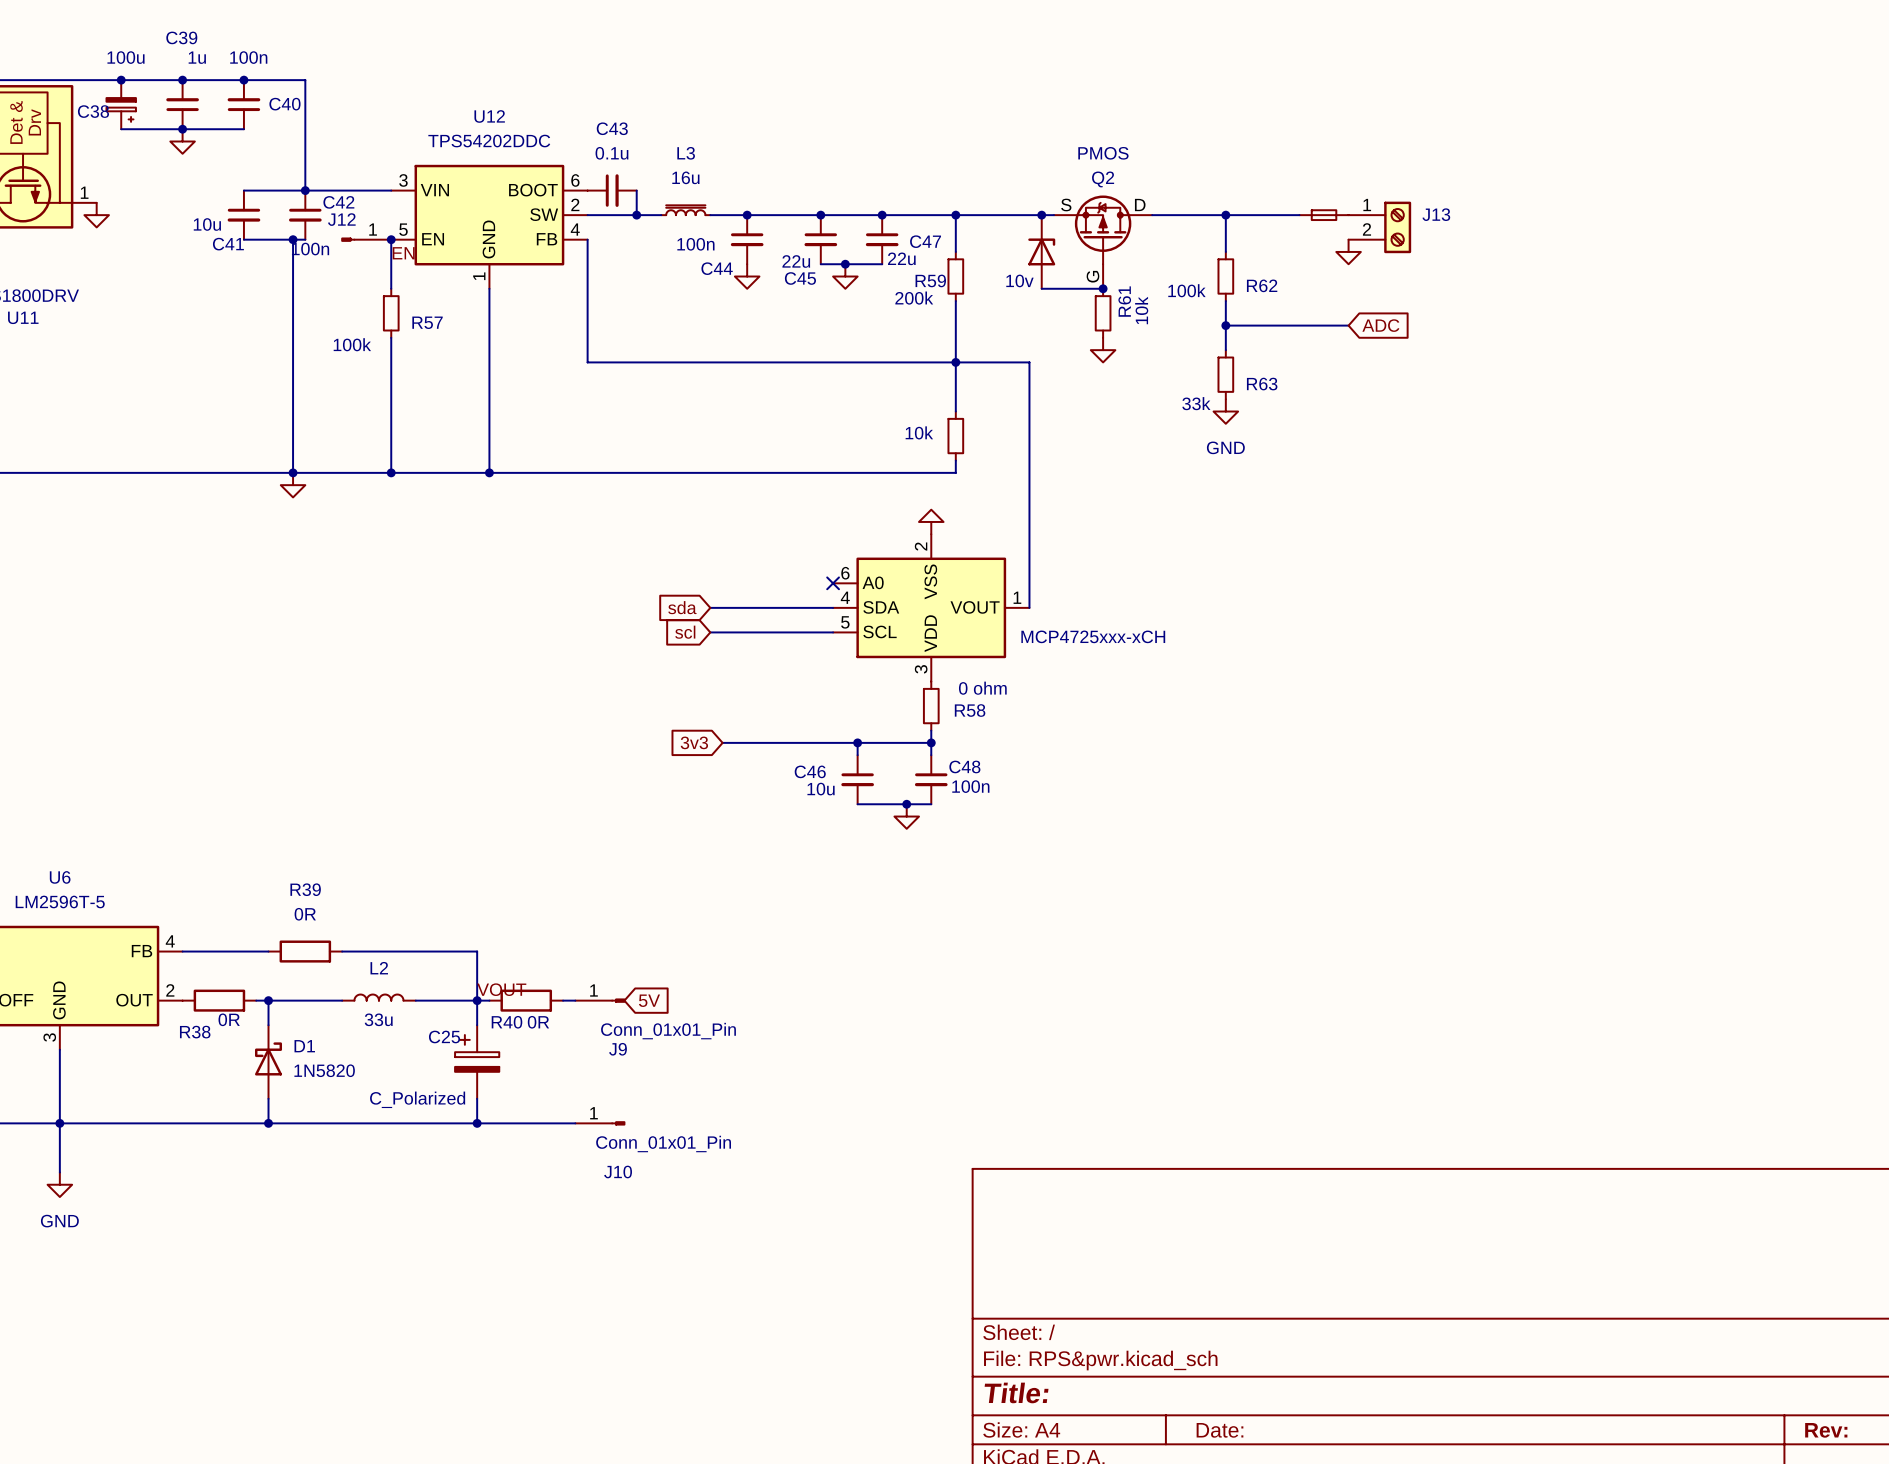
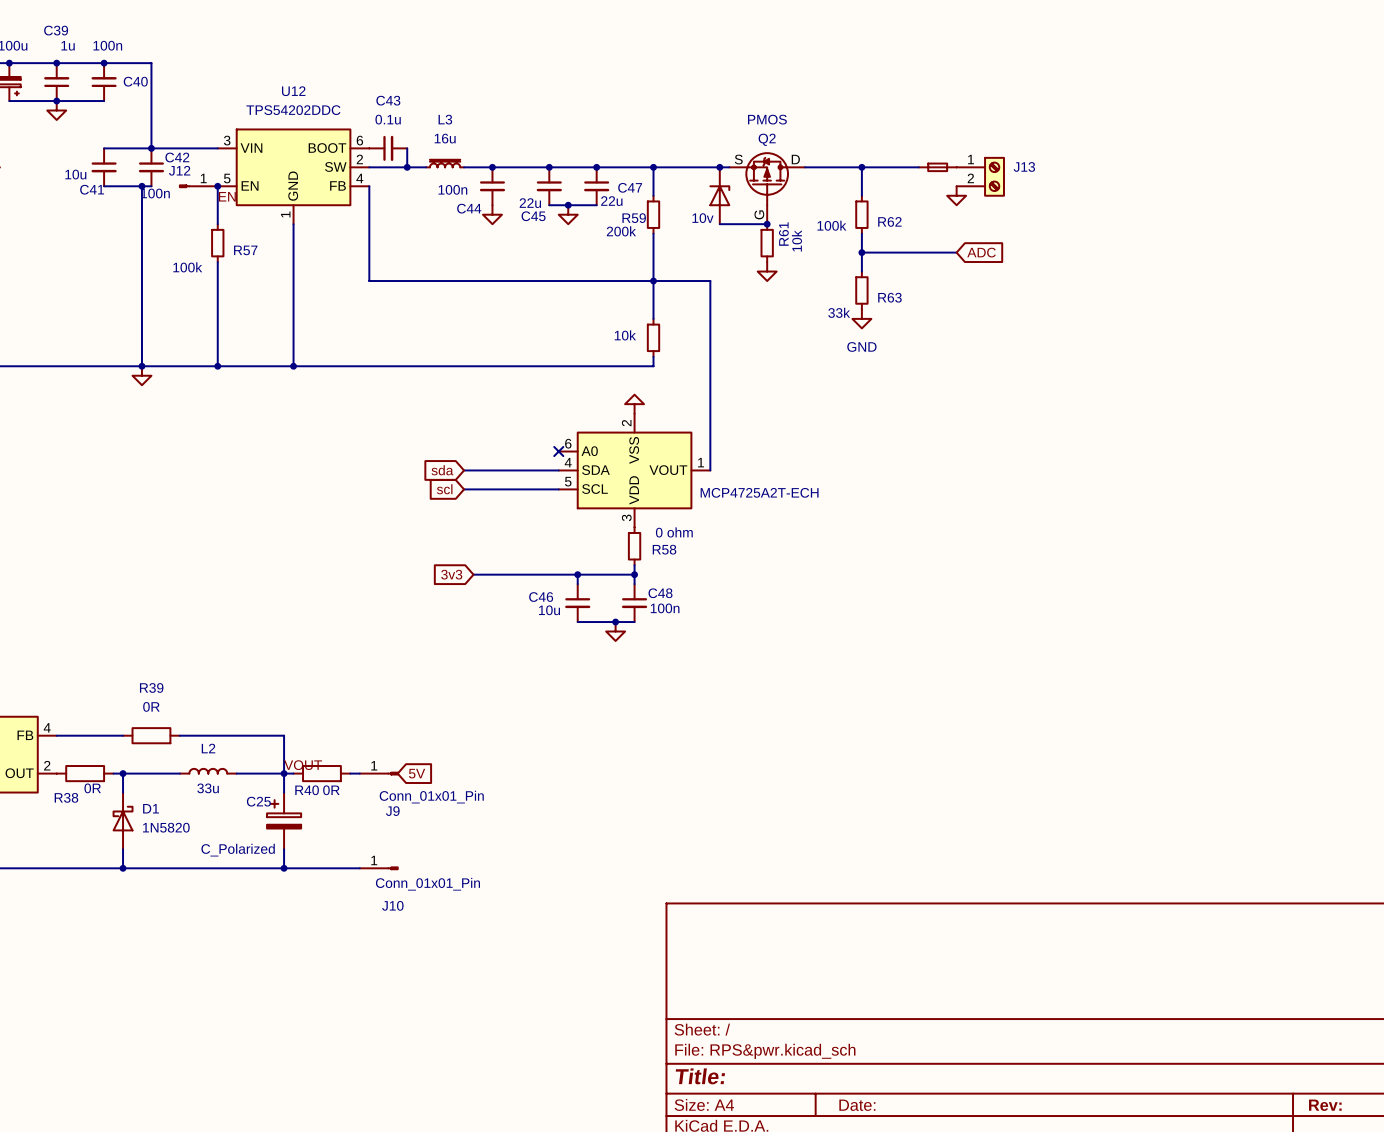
part value: MCP4725xxx-xCH (1093, 636) -> MCP4725A2T-ECH (759, 492)

